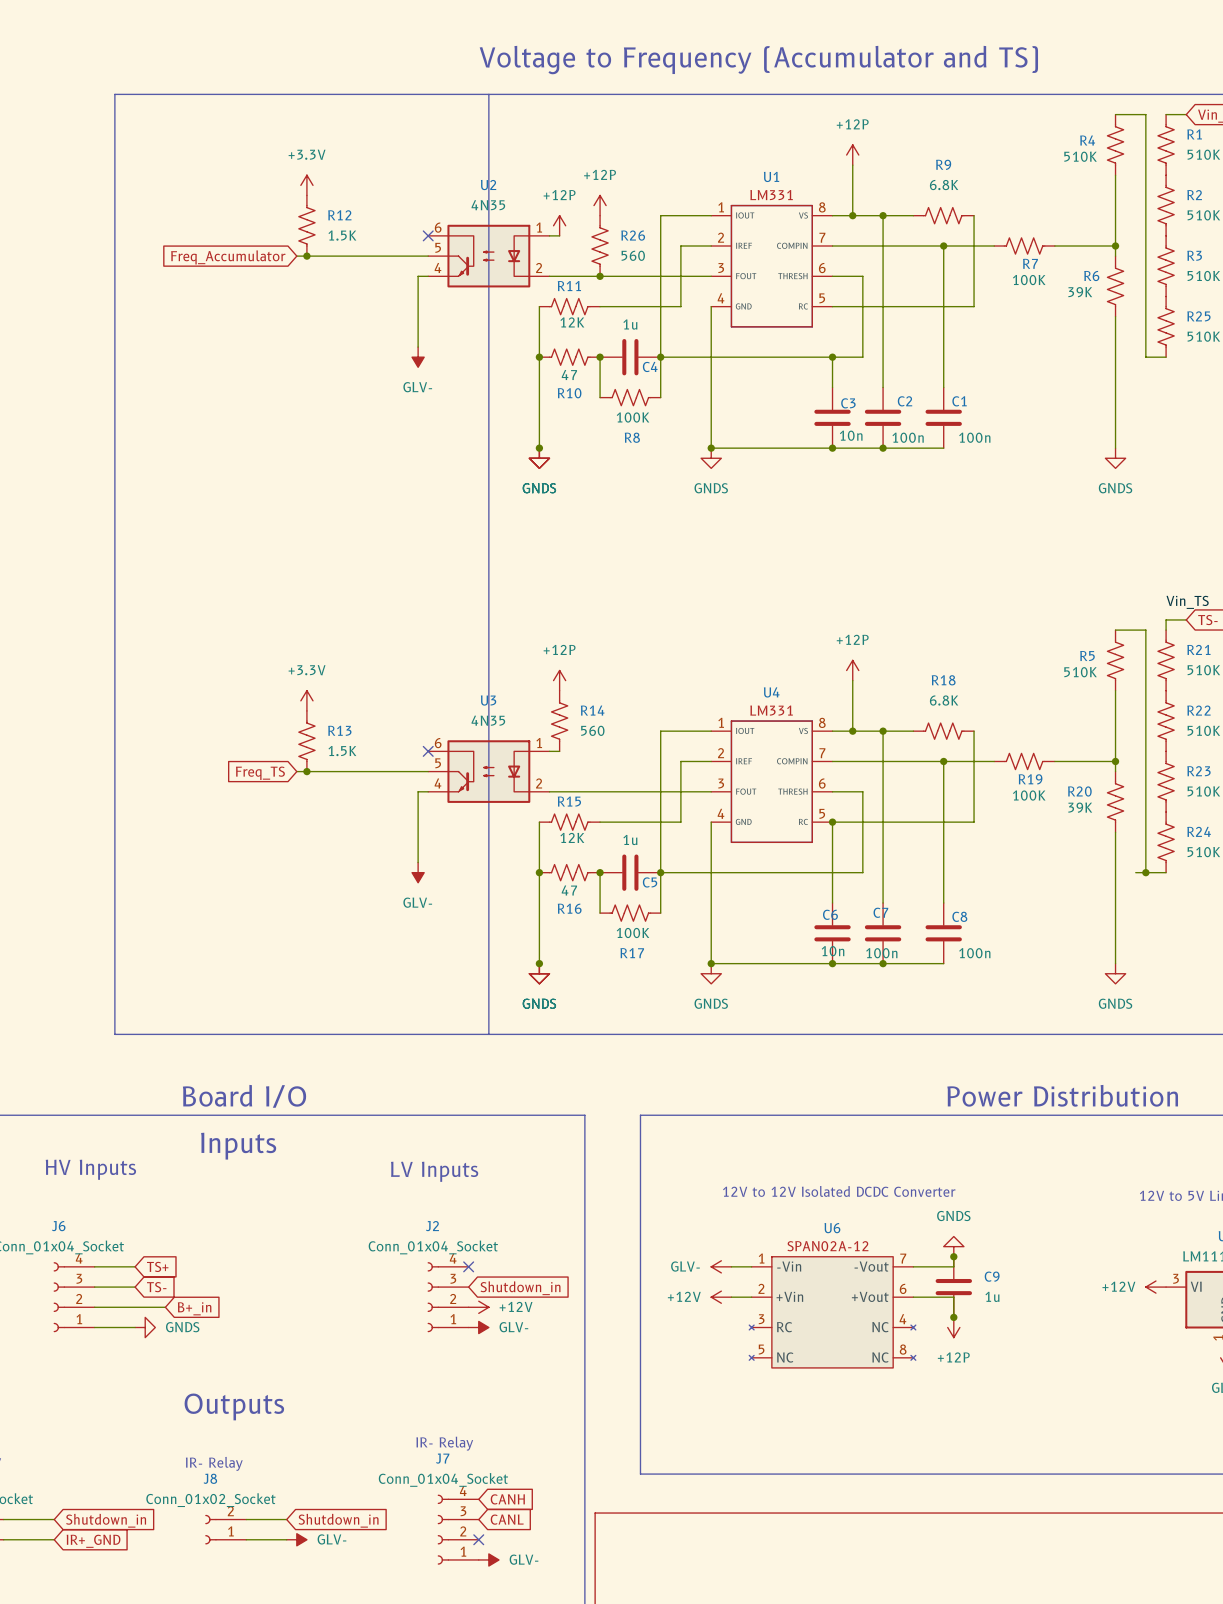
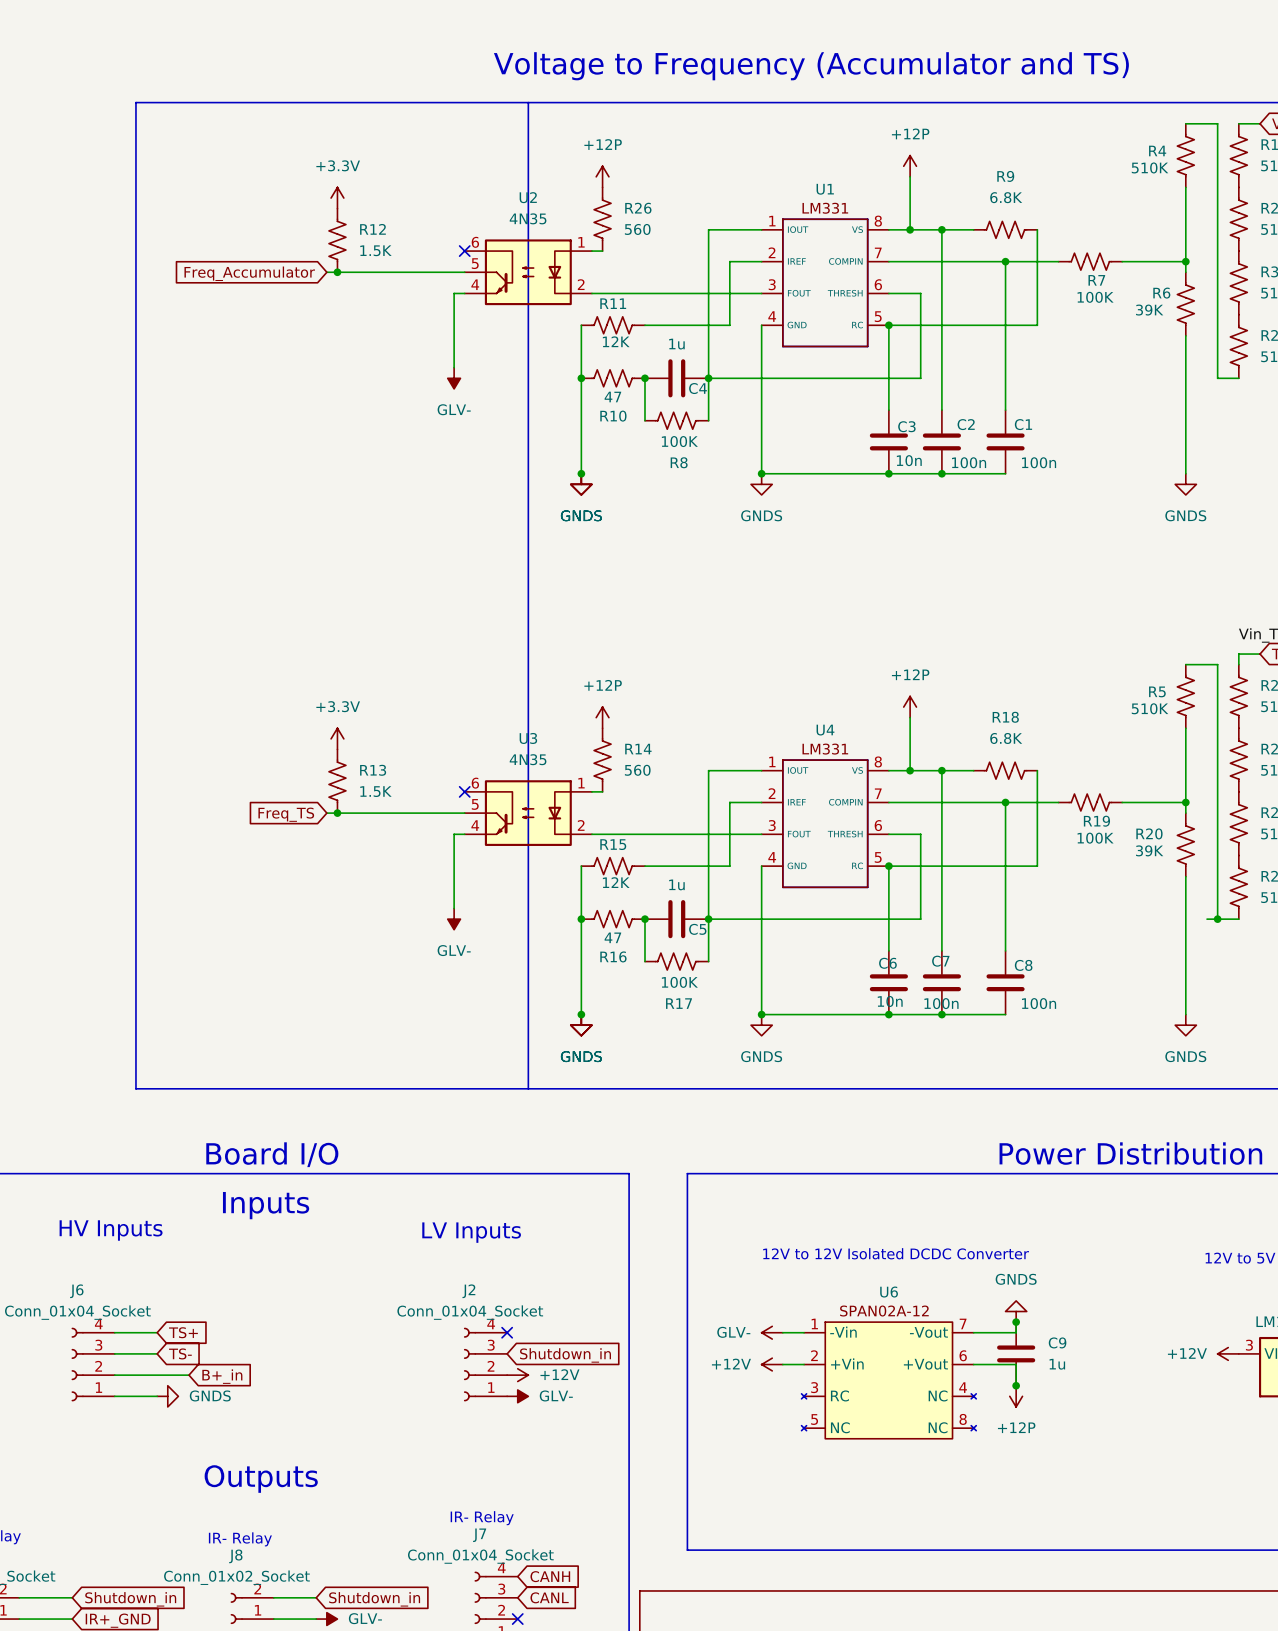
power symbol: none -> +12P (602, 176)
power symbol: +12P (600, 205) -> none
power symbol: +12P (559, 225) -> none
R26 position: (600, 246) -> (602, 219)
junction: (600, 276) -> none
wire: none -> (888, 325) (888, 378)
junction: none -> (888, 325)
junction: (832, 357) -> none

